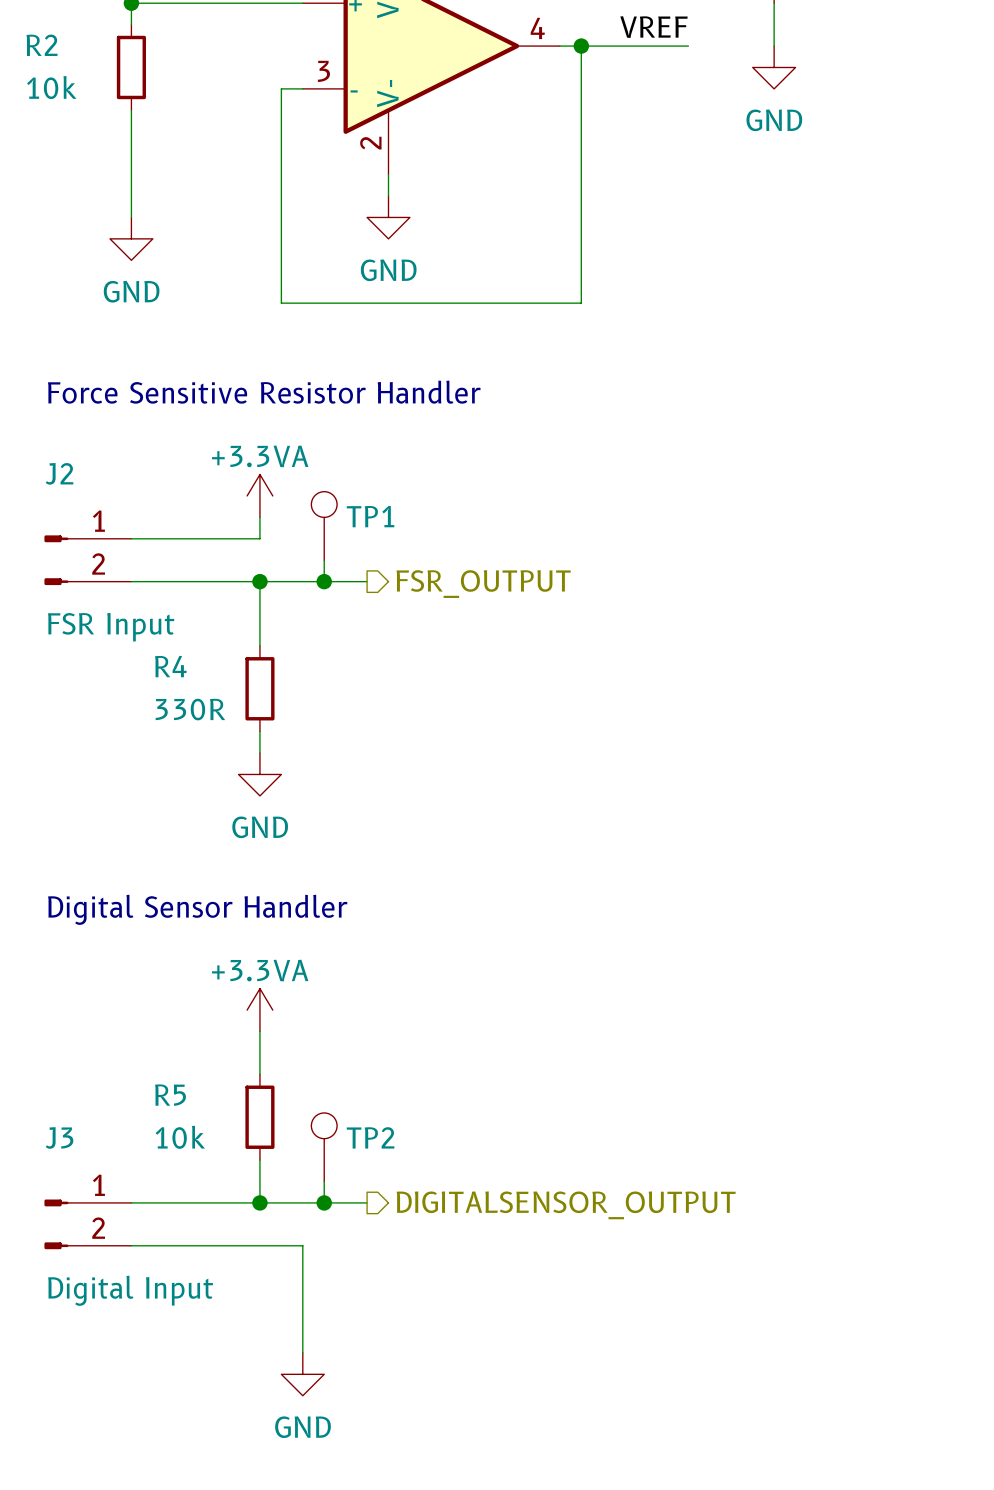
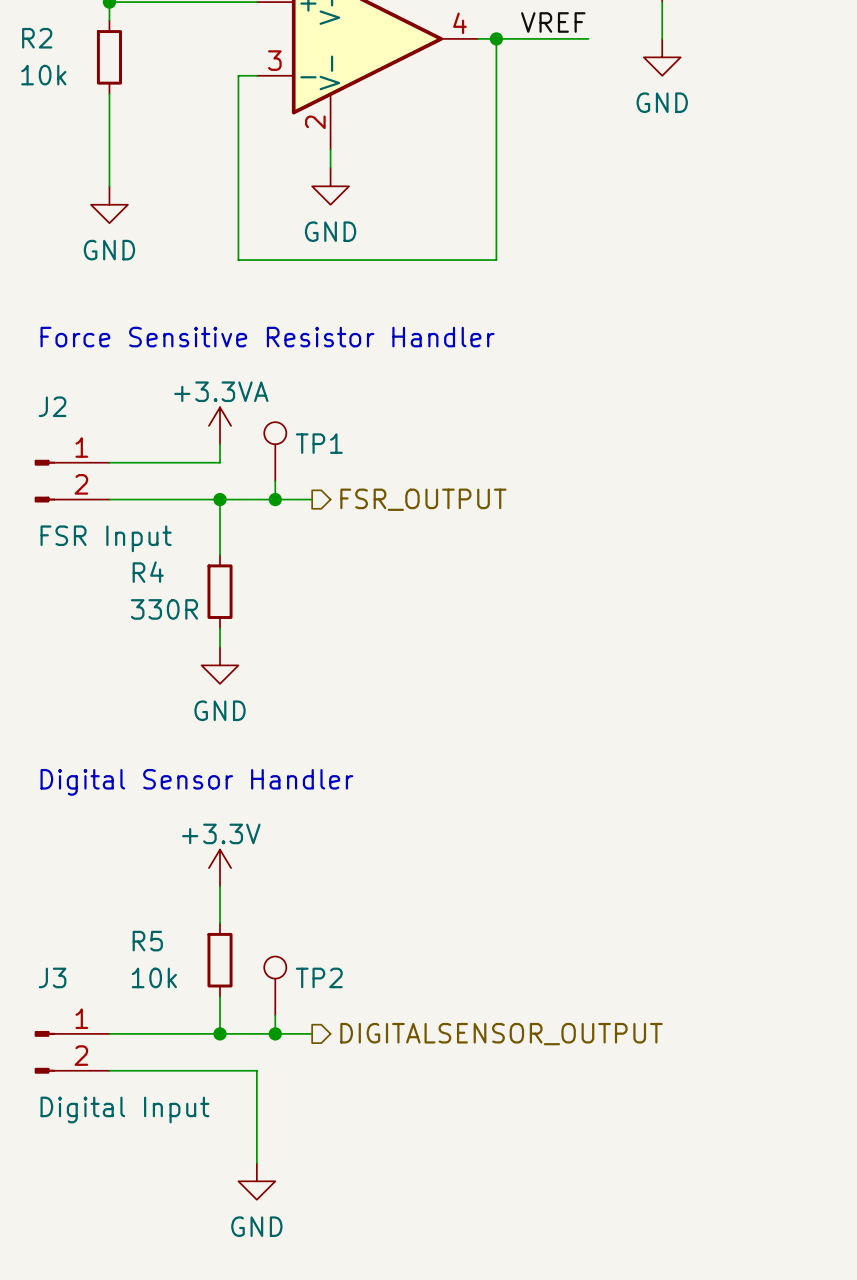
power symbol: +3.3VA (259, 1010) -> +3.3V (220, 868)

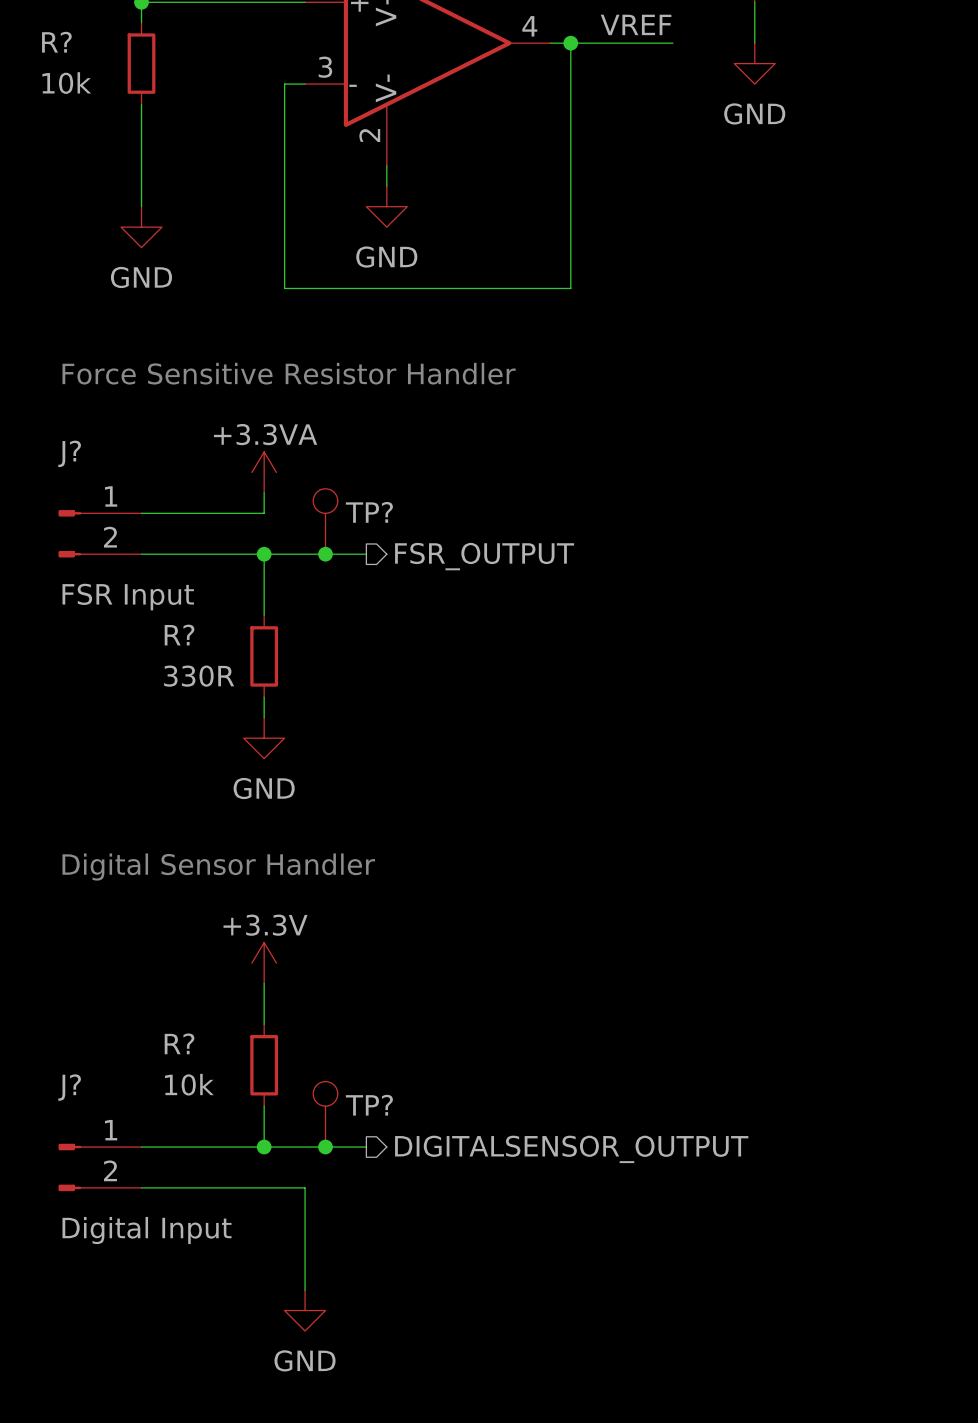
R2 name: R2 (37, 38) -> R? (56, 42)
J2 name: J2 (52, 406) -> J? (69, 453)
TP1: (275, 451) -> none
TP?: none -> (325, 521)
R4 name: R4 (148, 572) -> R? (179, 635)
R5 name: R5 (147, 941) -> R? (179, 1043)
J3 name: J3 (52, 977) -> J? (69, 1087)
TP2: (275, 986) -> none
TP?: none -> (325, 1114)

